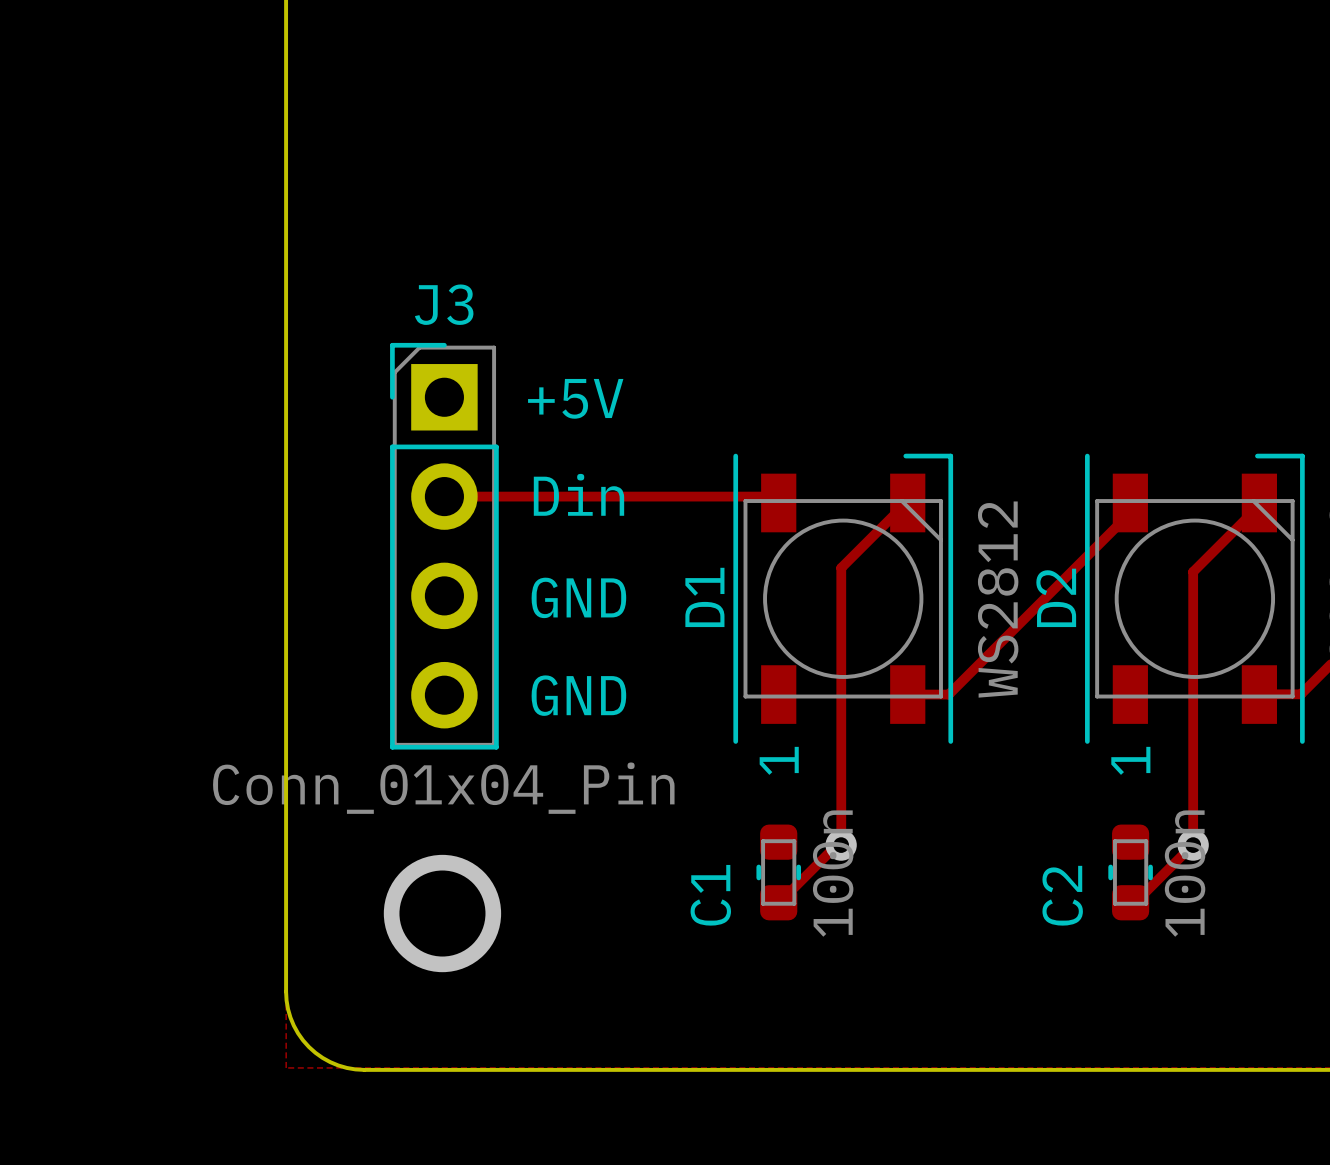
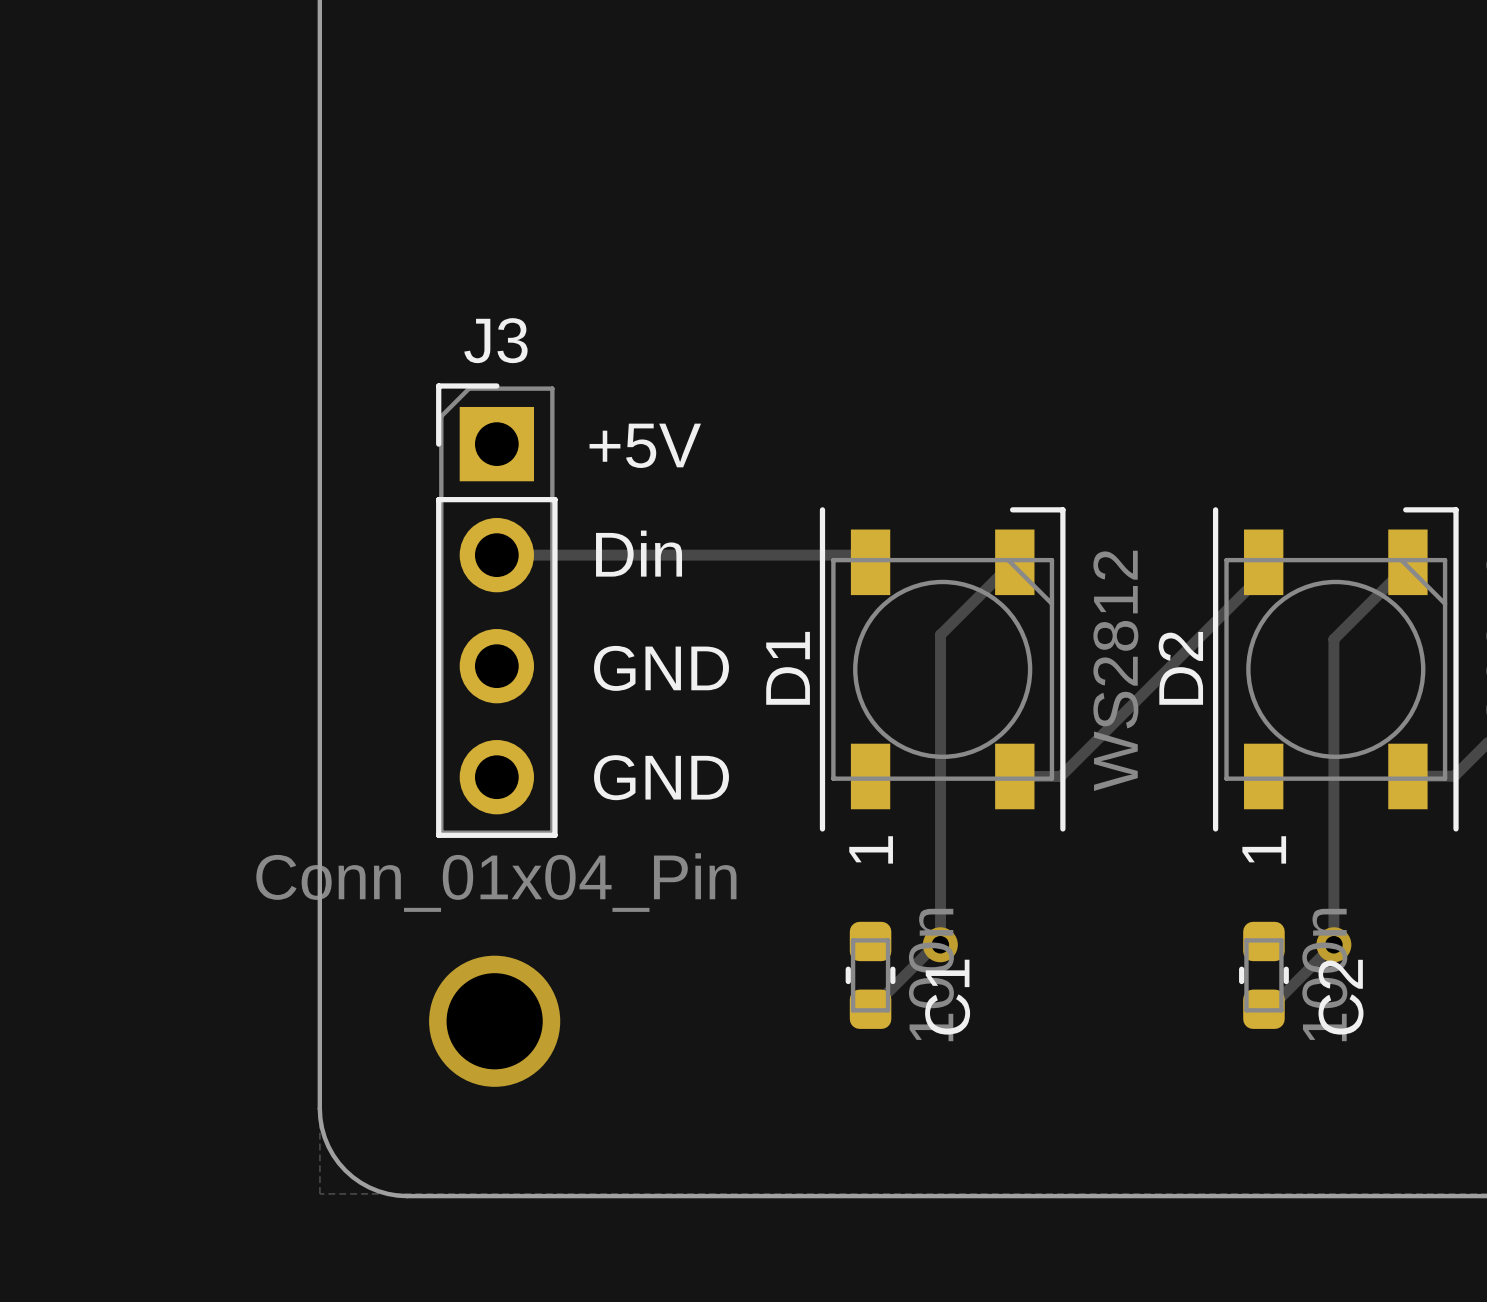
C1 name position: C1 (710, 895) -> C1 (947, 997)
C2 name position: C2 (1062, 895) -> C2 (1340, 997)

